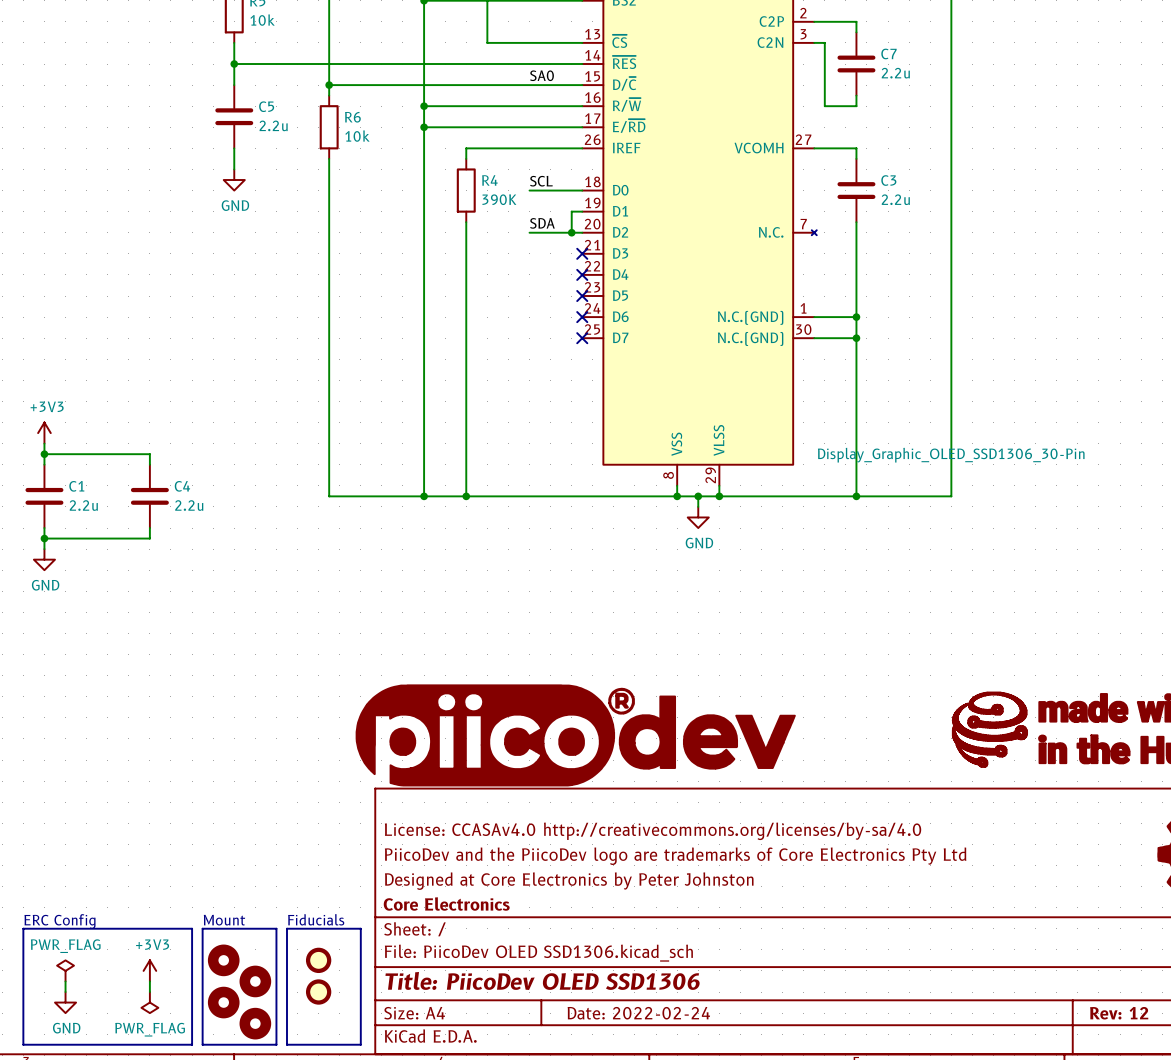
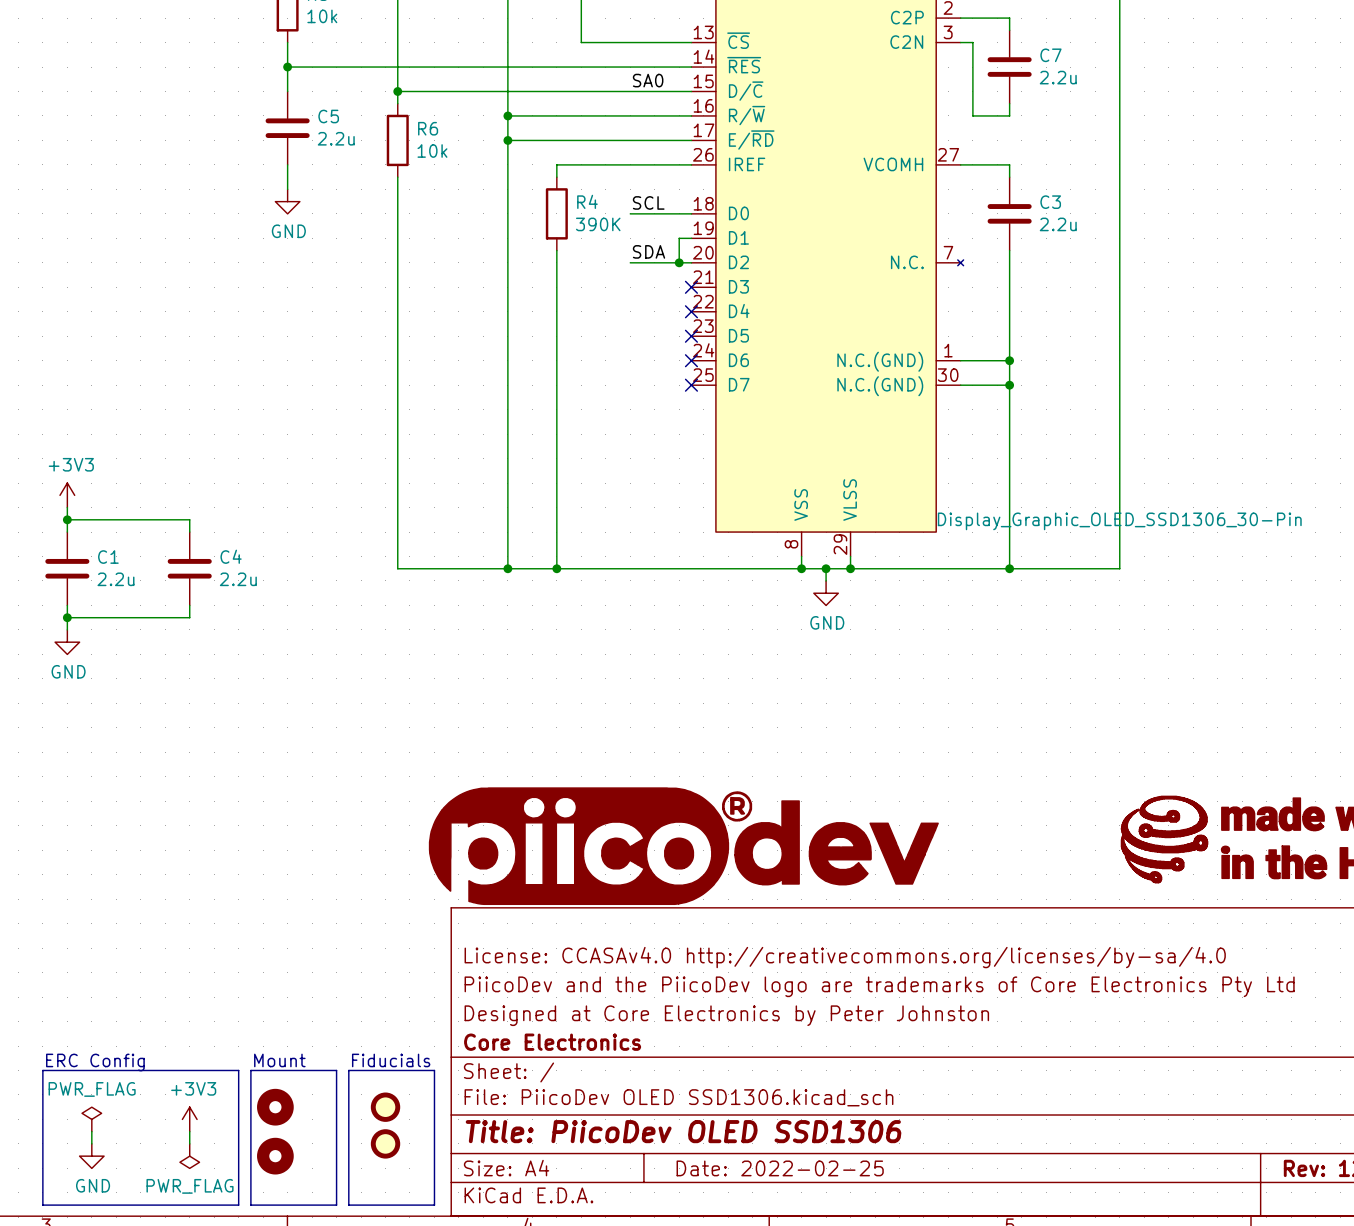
part: (255, 981) -> none
title block: Date: 2022-02-24 (638, 1013) -> Date: 2022-02-25 (780, 1168)
part: (255, 1023) -> none

